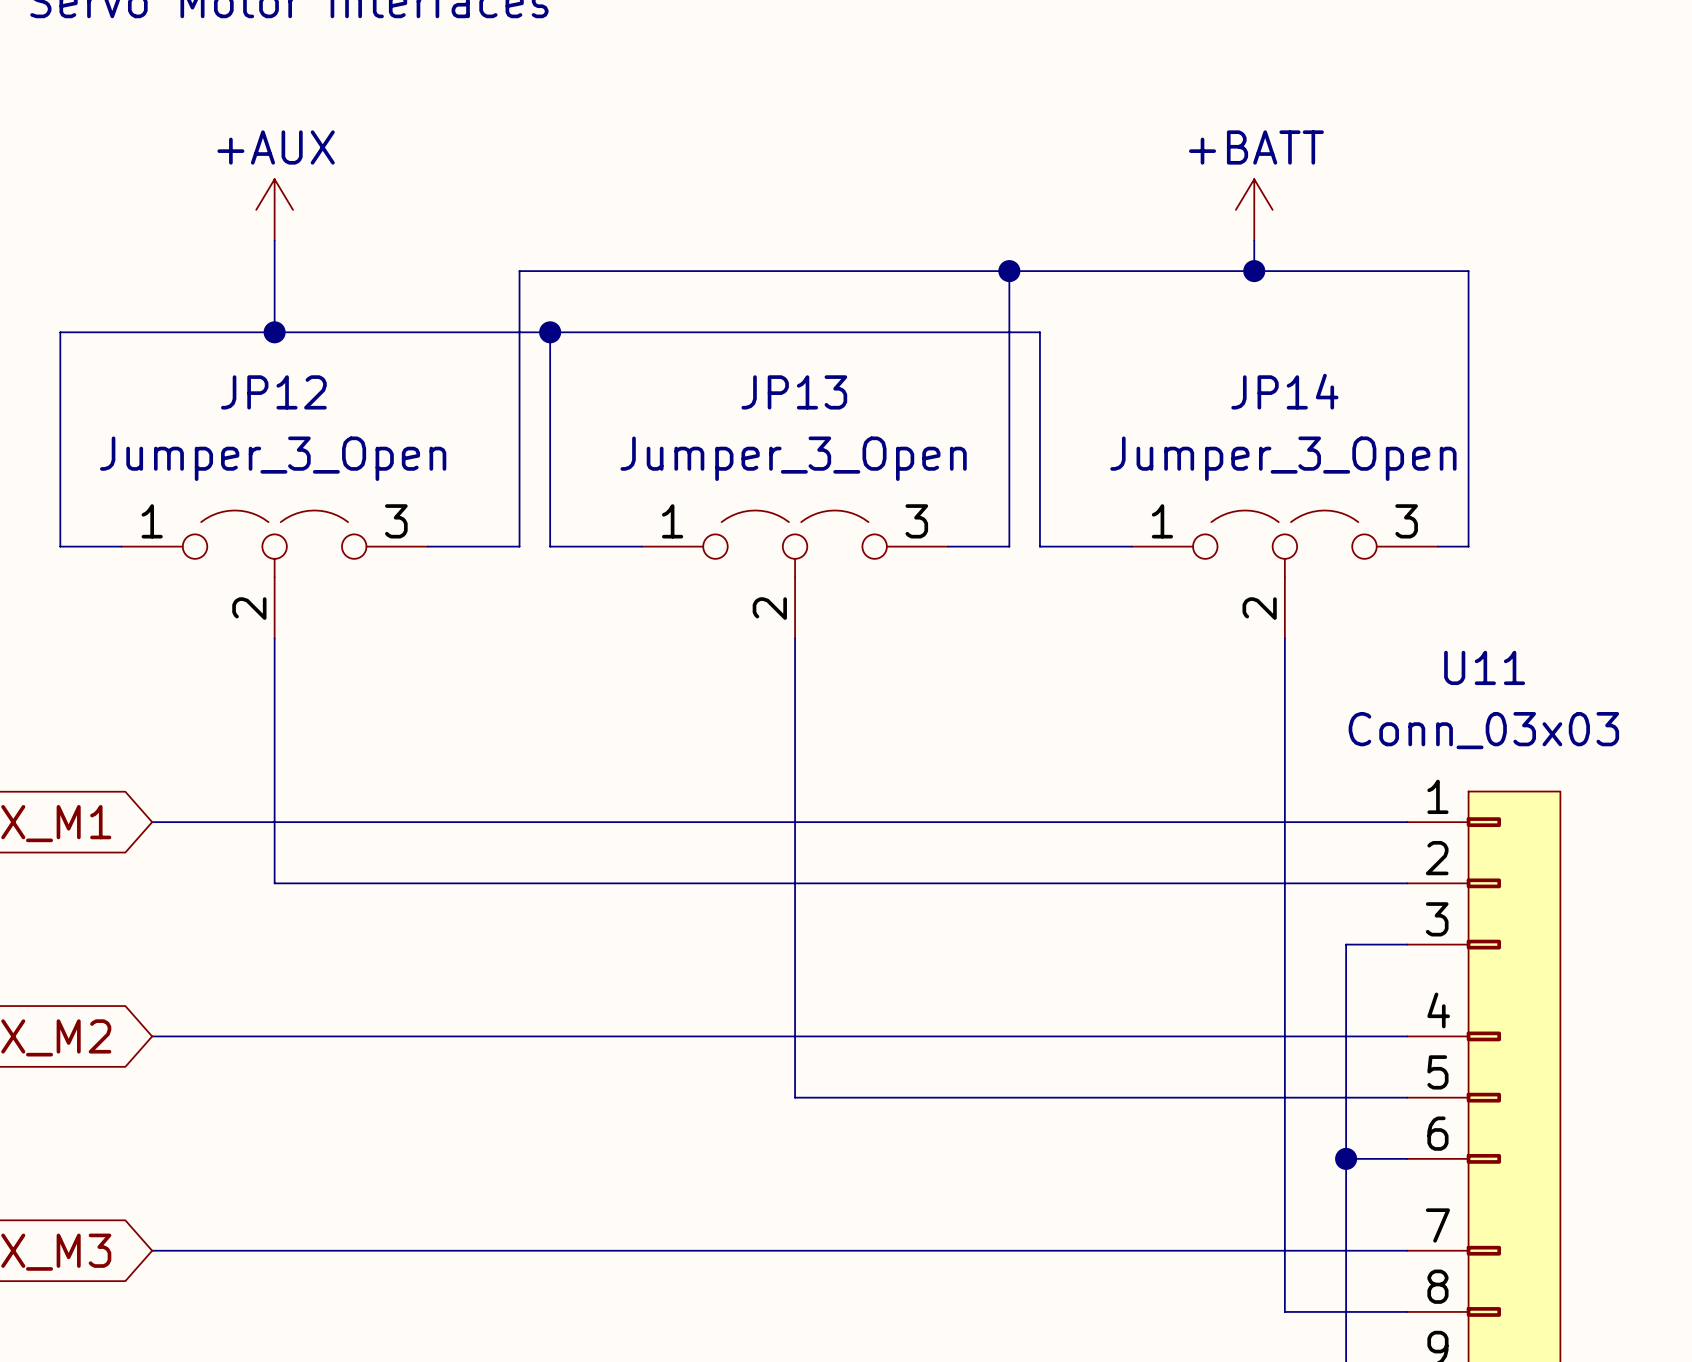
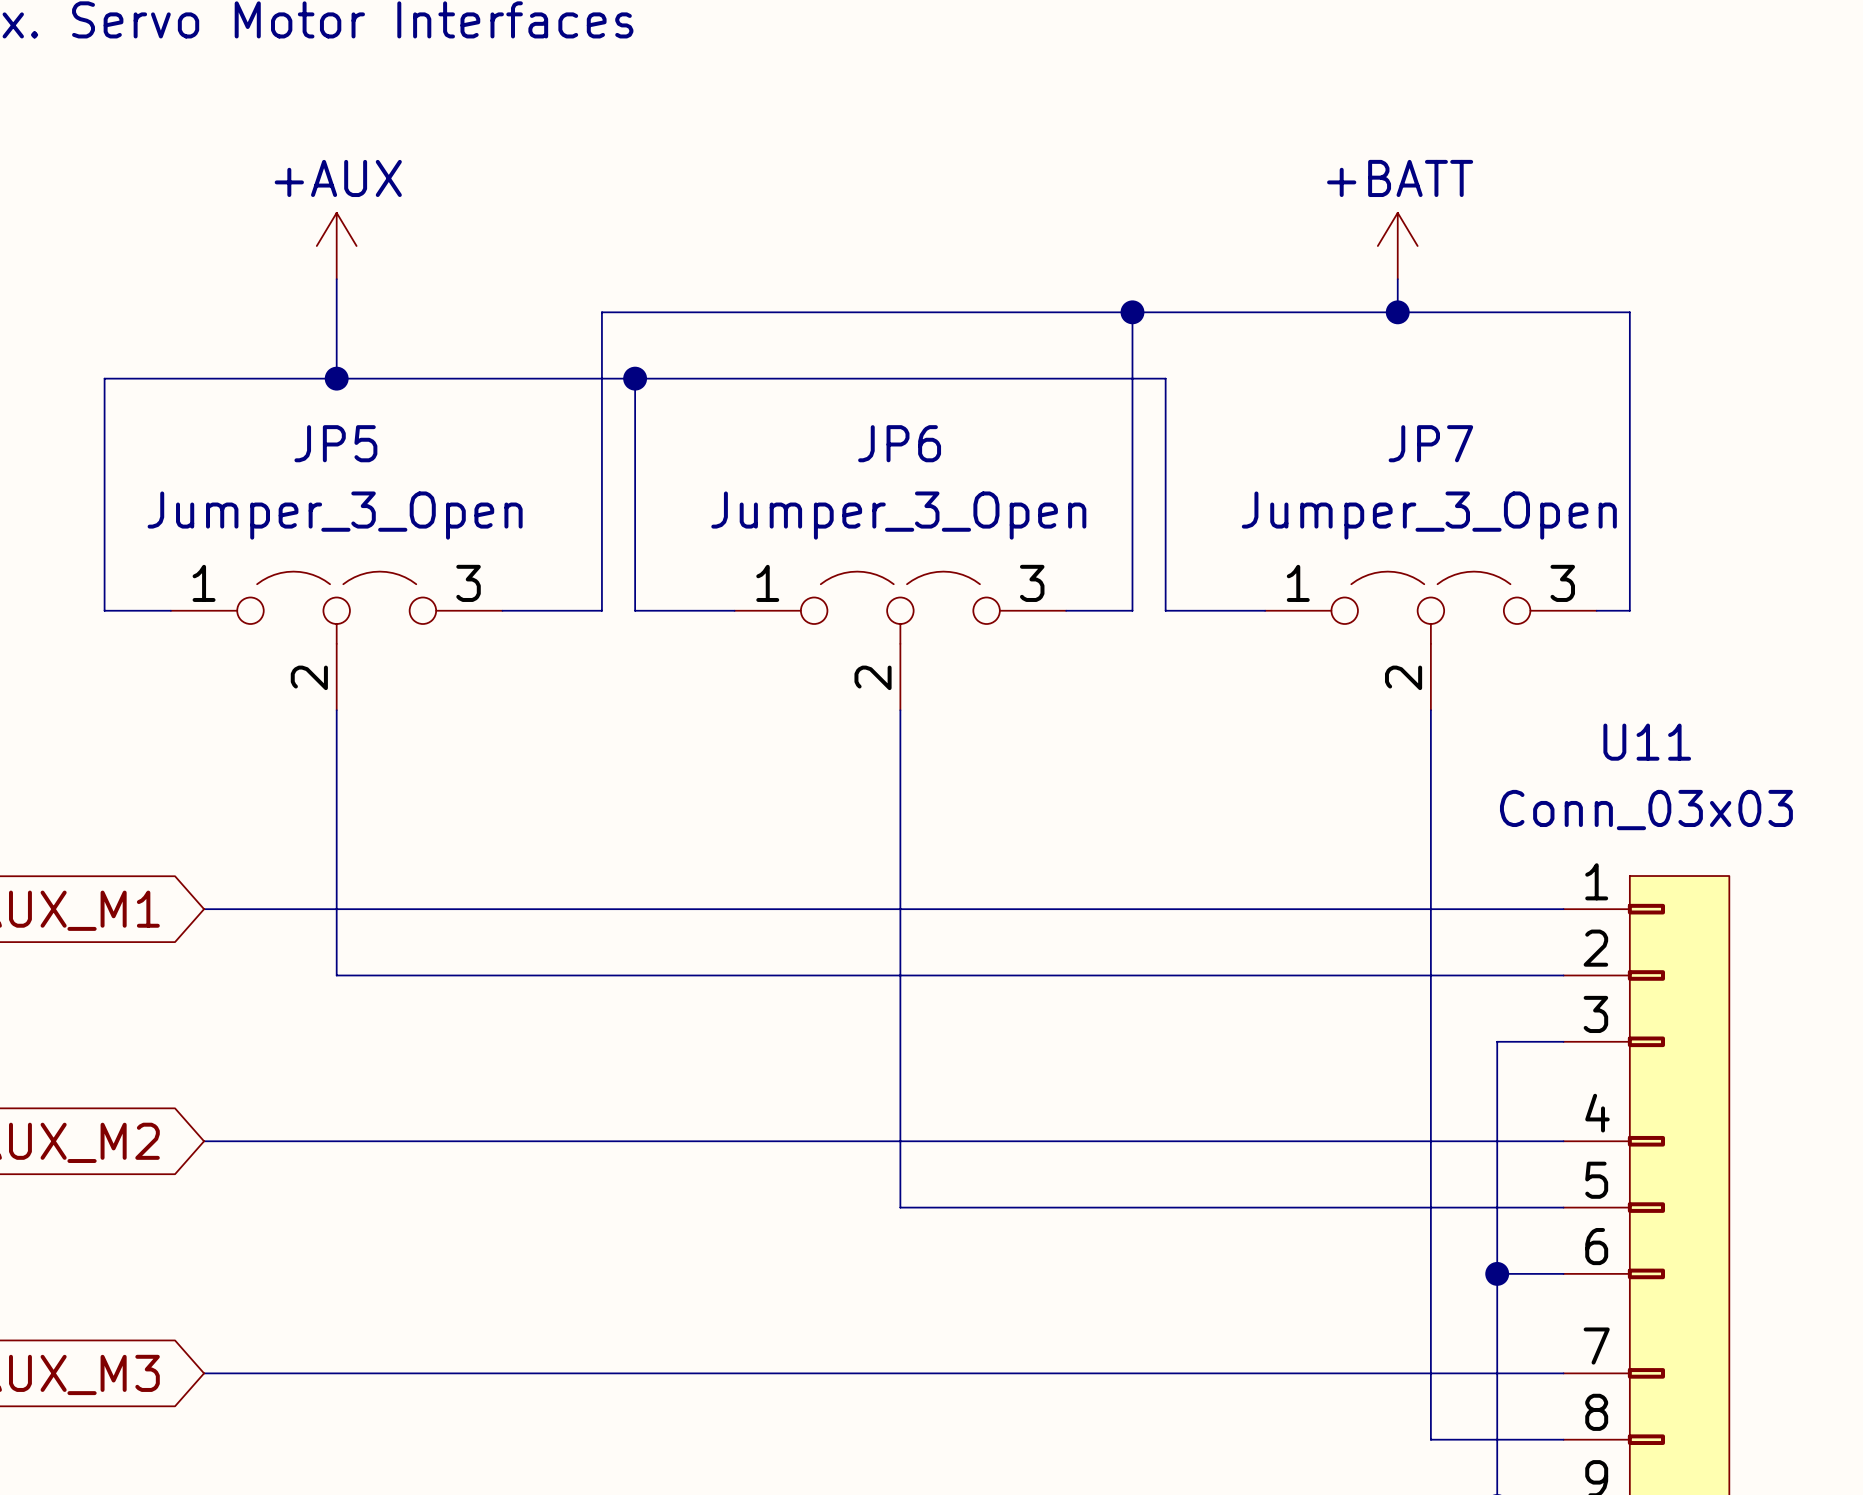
JP14 name: JP14 (1284, 391) -> JP7 (1430, 443)
JP12 name: JP12 (273, 392) -> JP5 (335, 443)
JP13 name: JP13 (794, 392) -> JP6 (899, 443)

